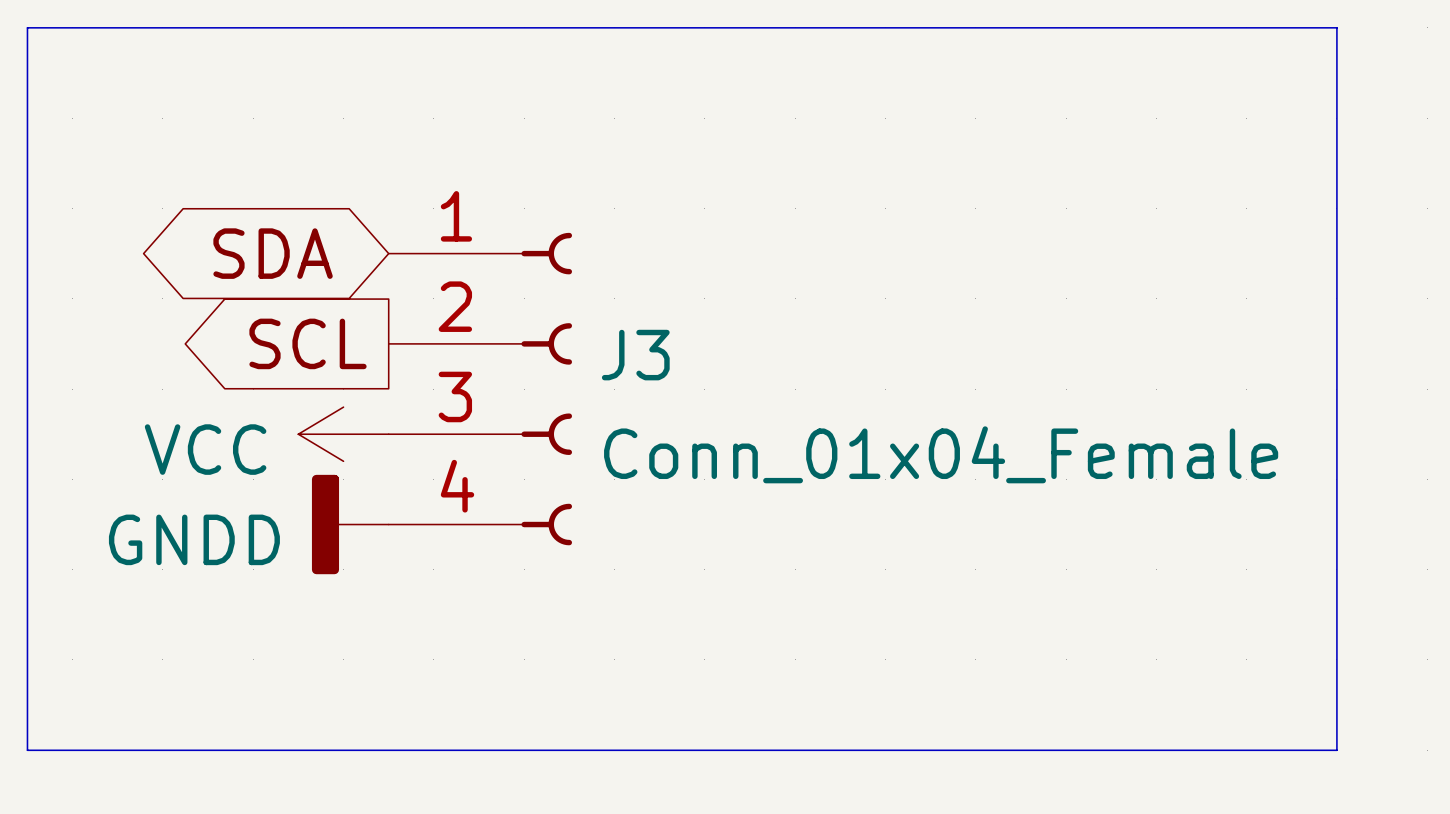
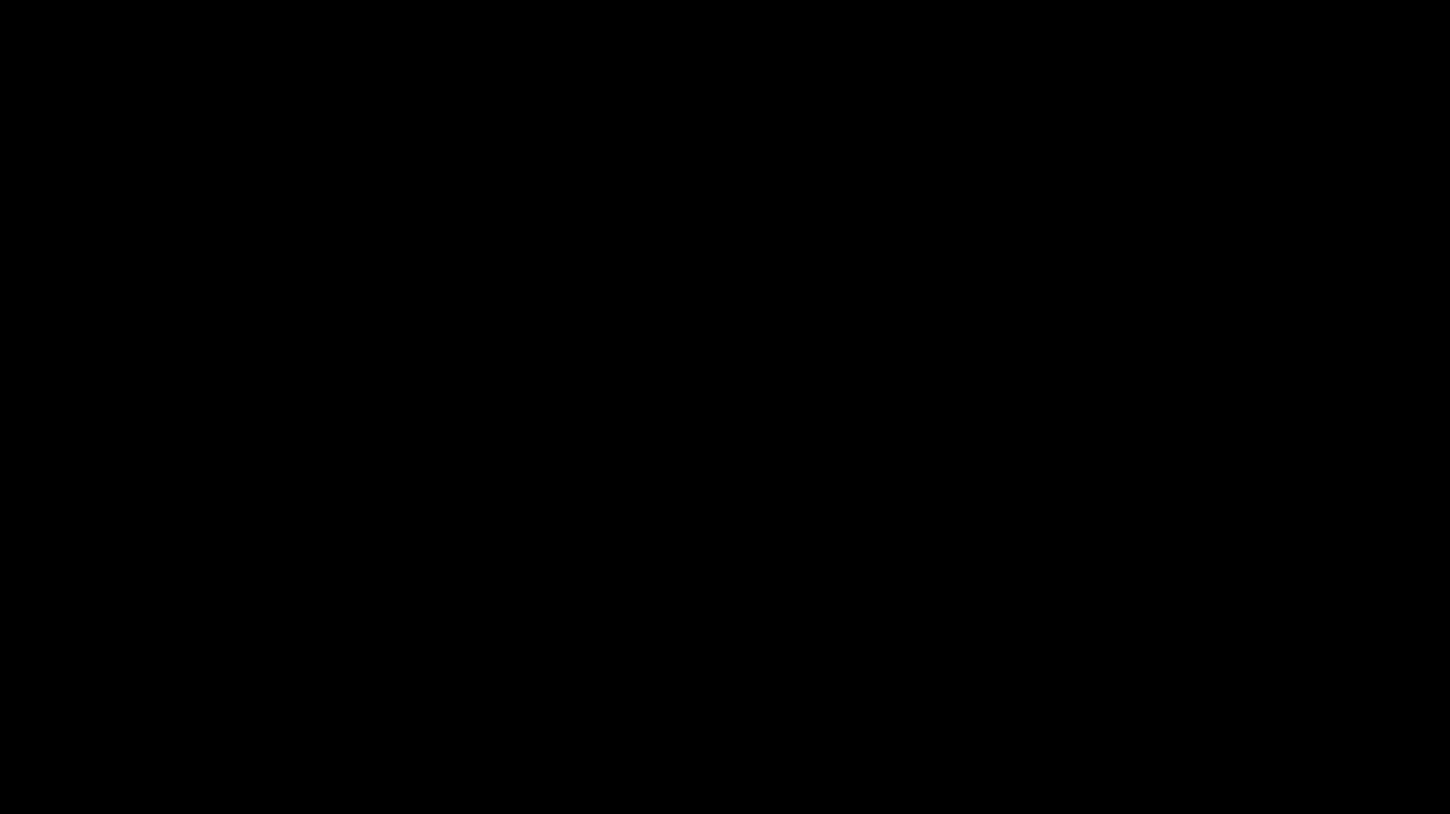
line: (27, 27) (1336, 27) (1336, 750) (27, 750) (27, 27) -> none
global label: SDA (273, 253) -> none
global label: SCL (308, 343) -> none
J3: Conn_01x04_Female (480, 389) -> none
power symbol: VCC (343, 434) -> none
power symbol: GNDD (350, 524) -> none

